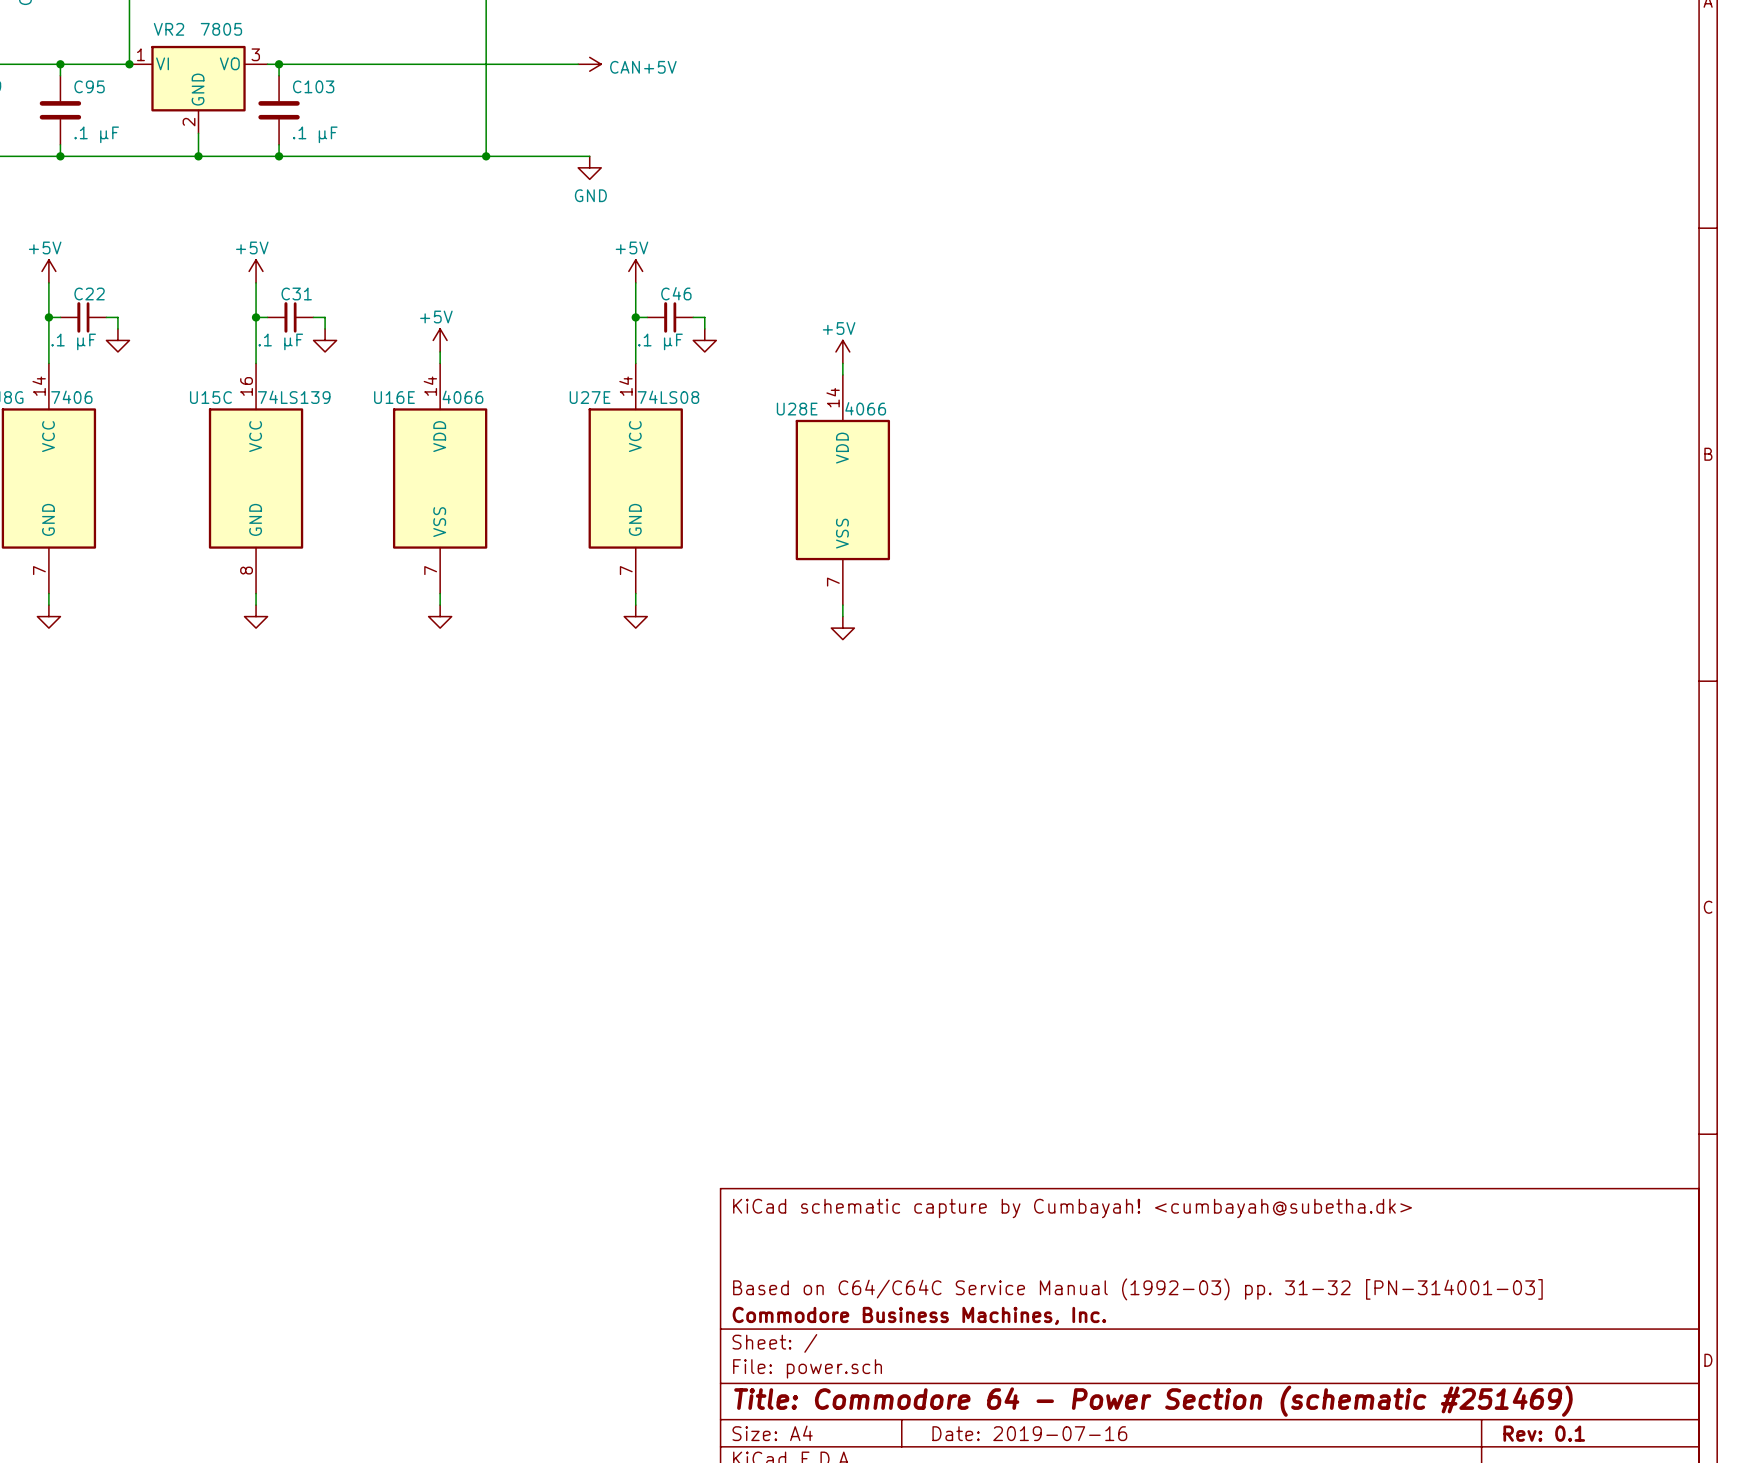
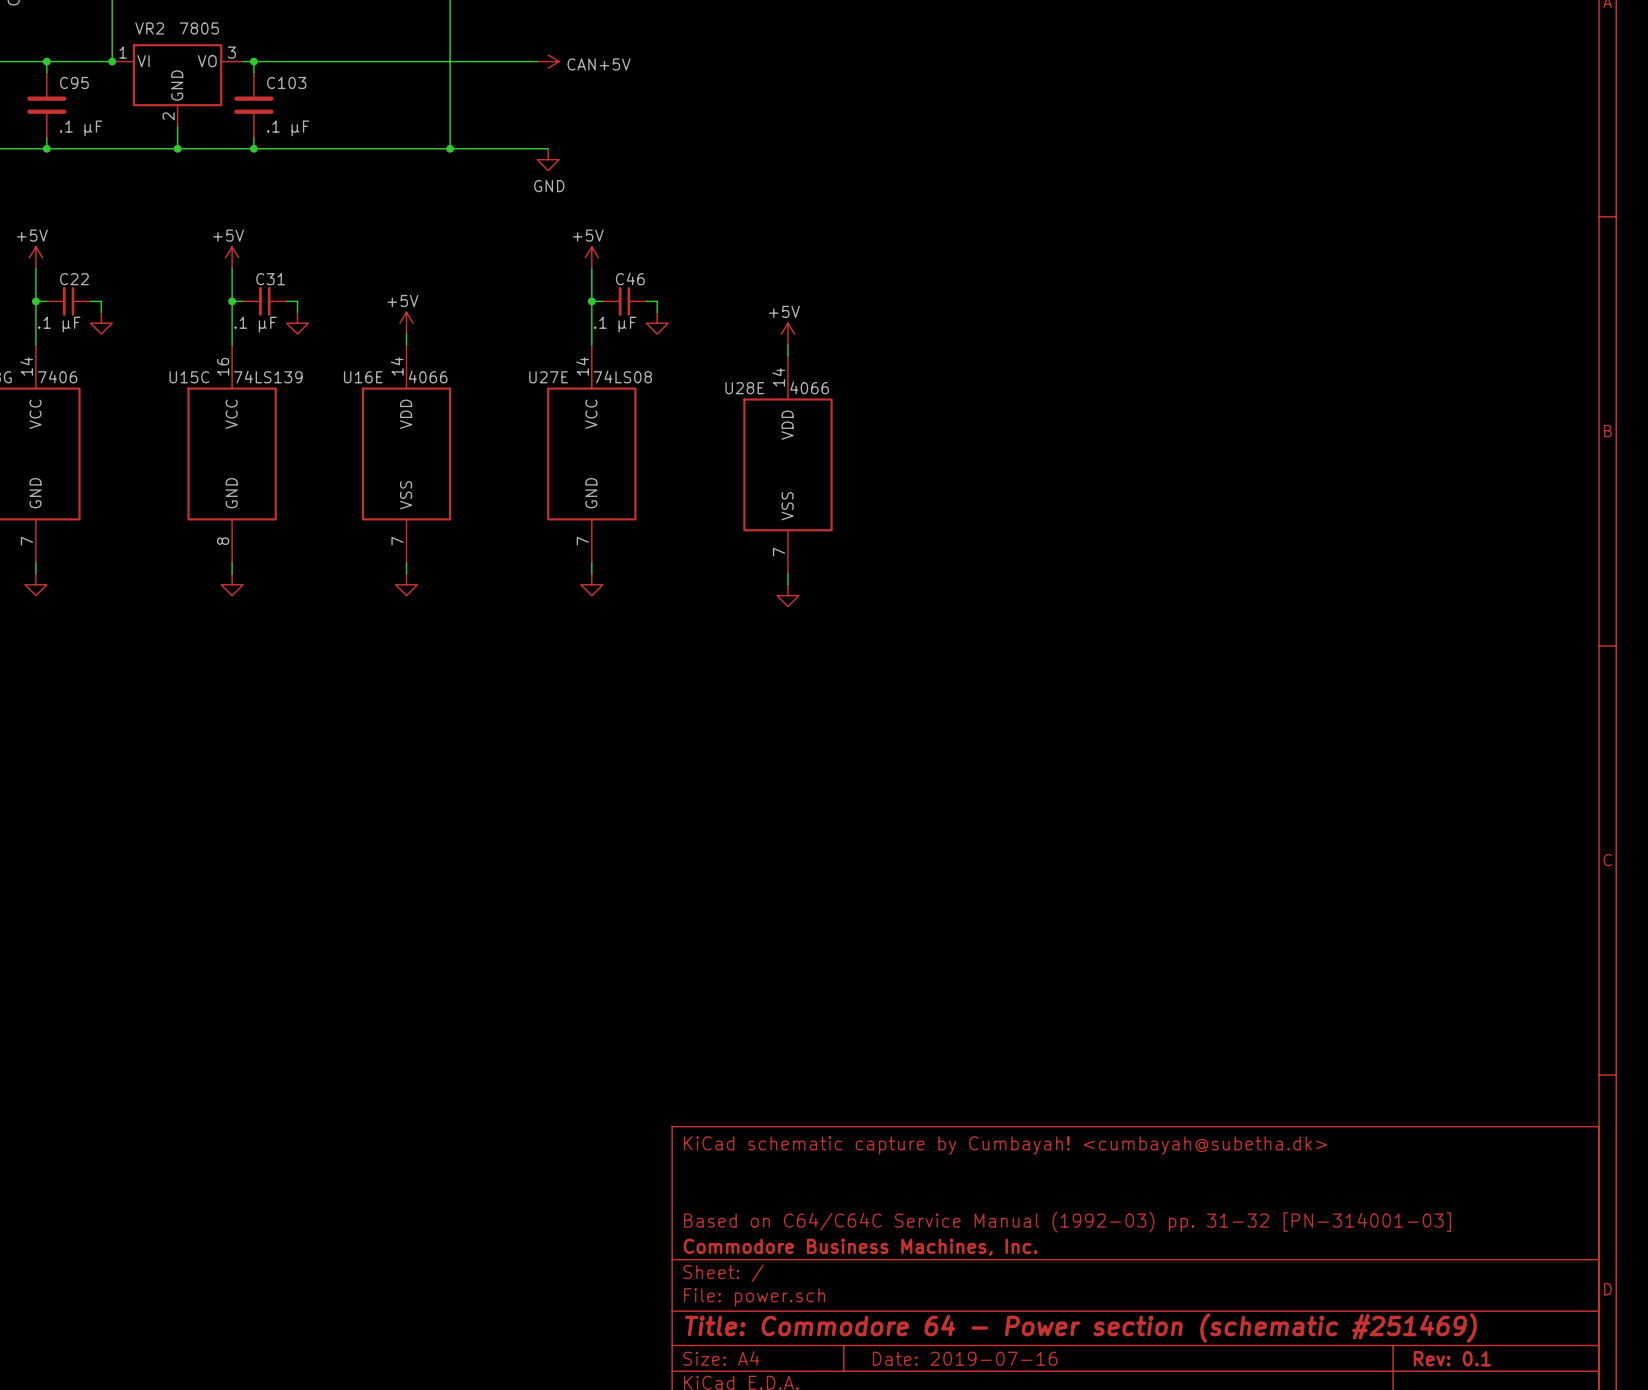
title block: Title: Commodore 64 - Power Section (schematic #251469) (1153, 1401) -> Title: Commodore 64 - Power section (schematic #251469) (1081, 1328)

